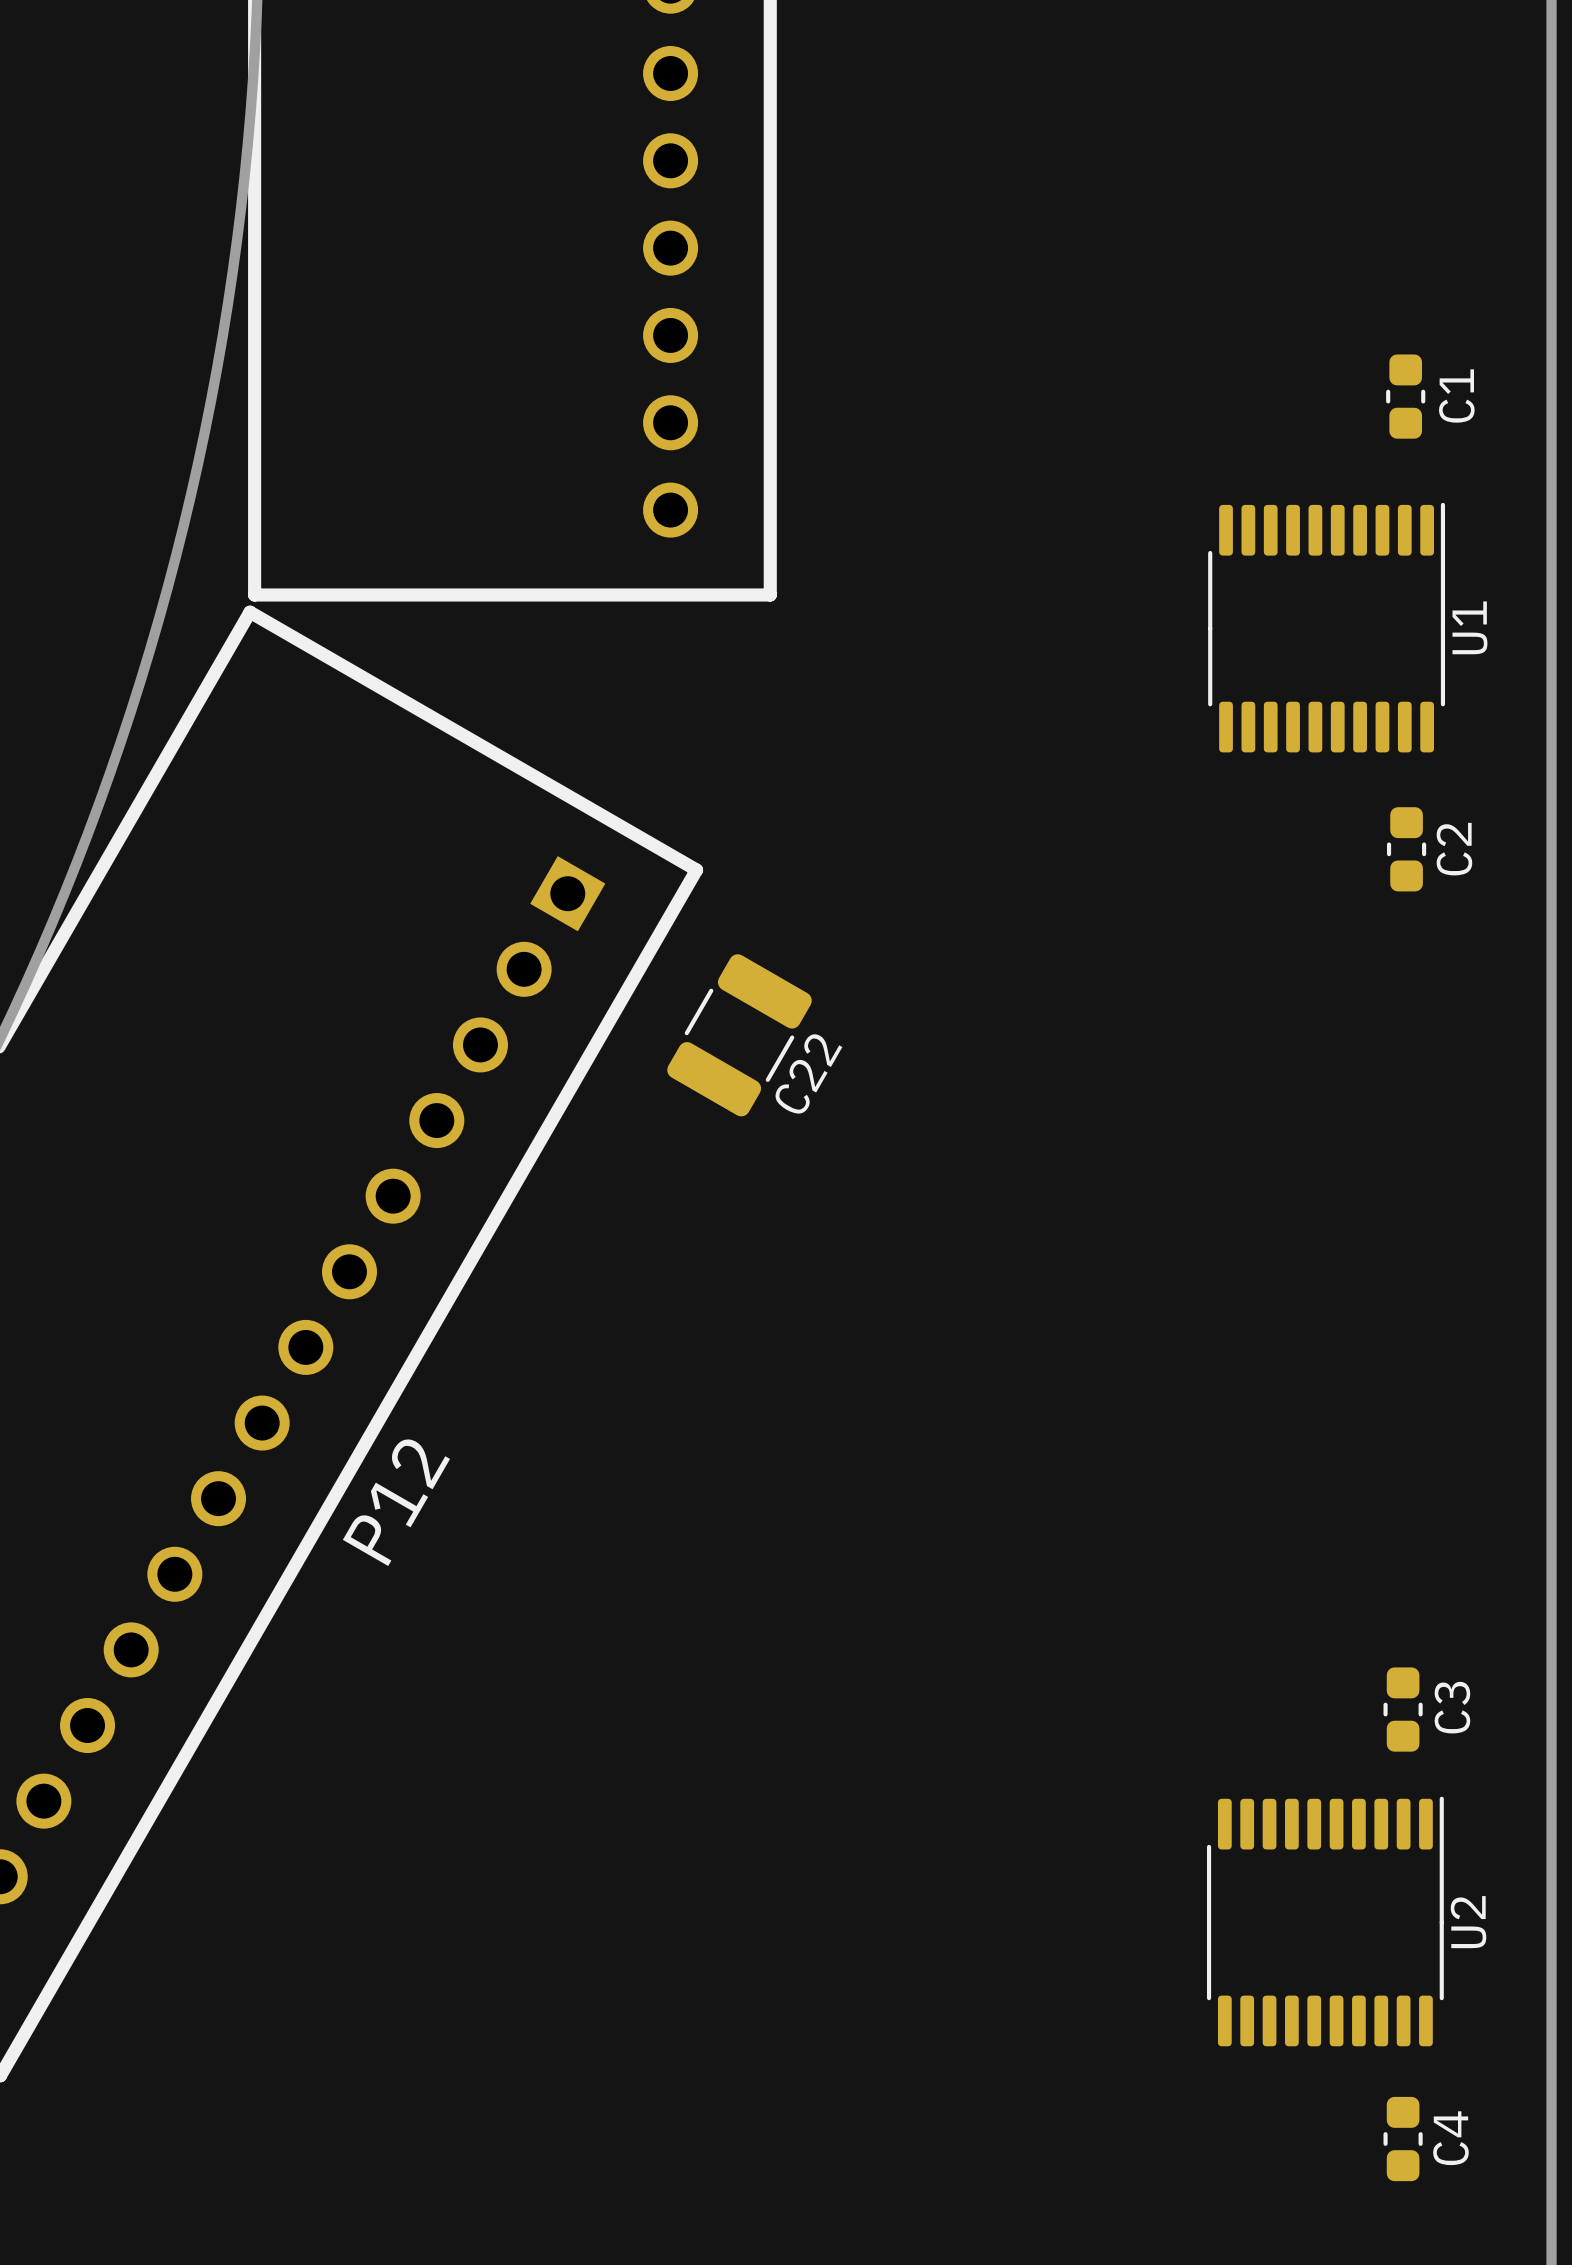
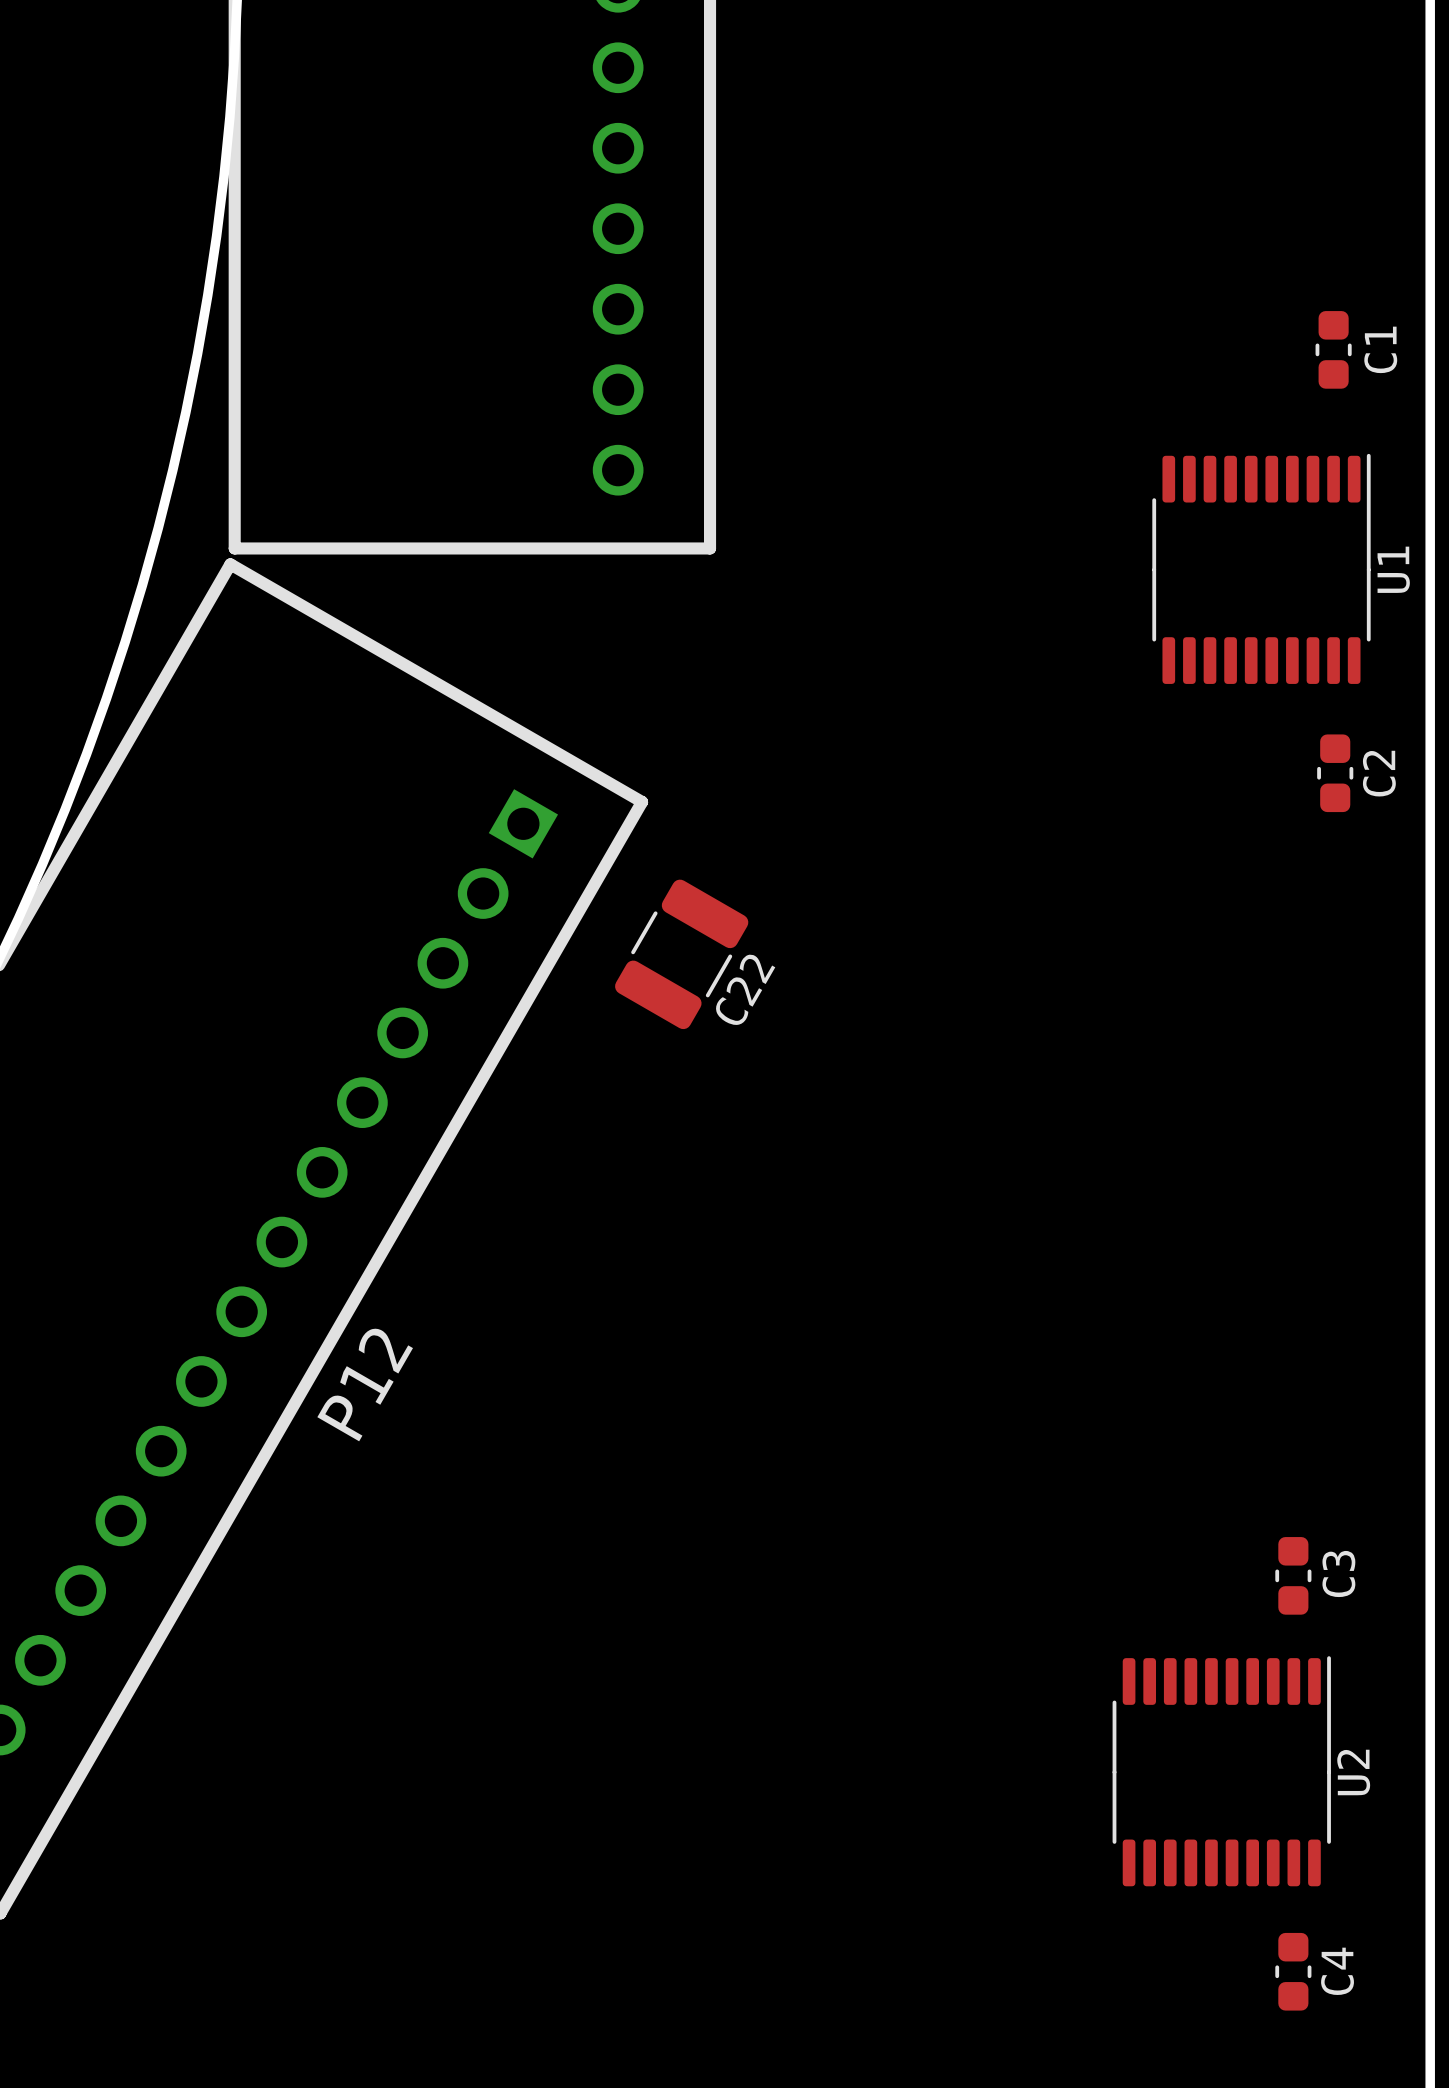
C1 position: (1405, 396) -> (1333, 349)
U1 position: (1326, 627) -> (1261, 568)
C2 position: (1406, 849) -> (1335, 773)

